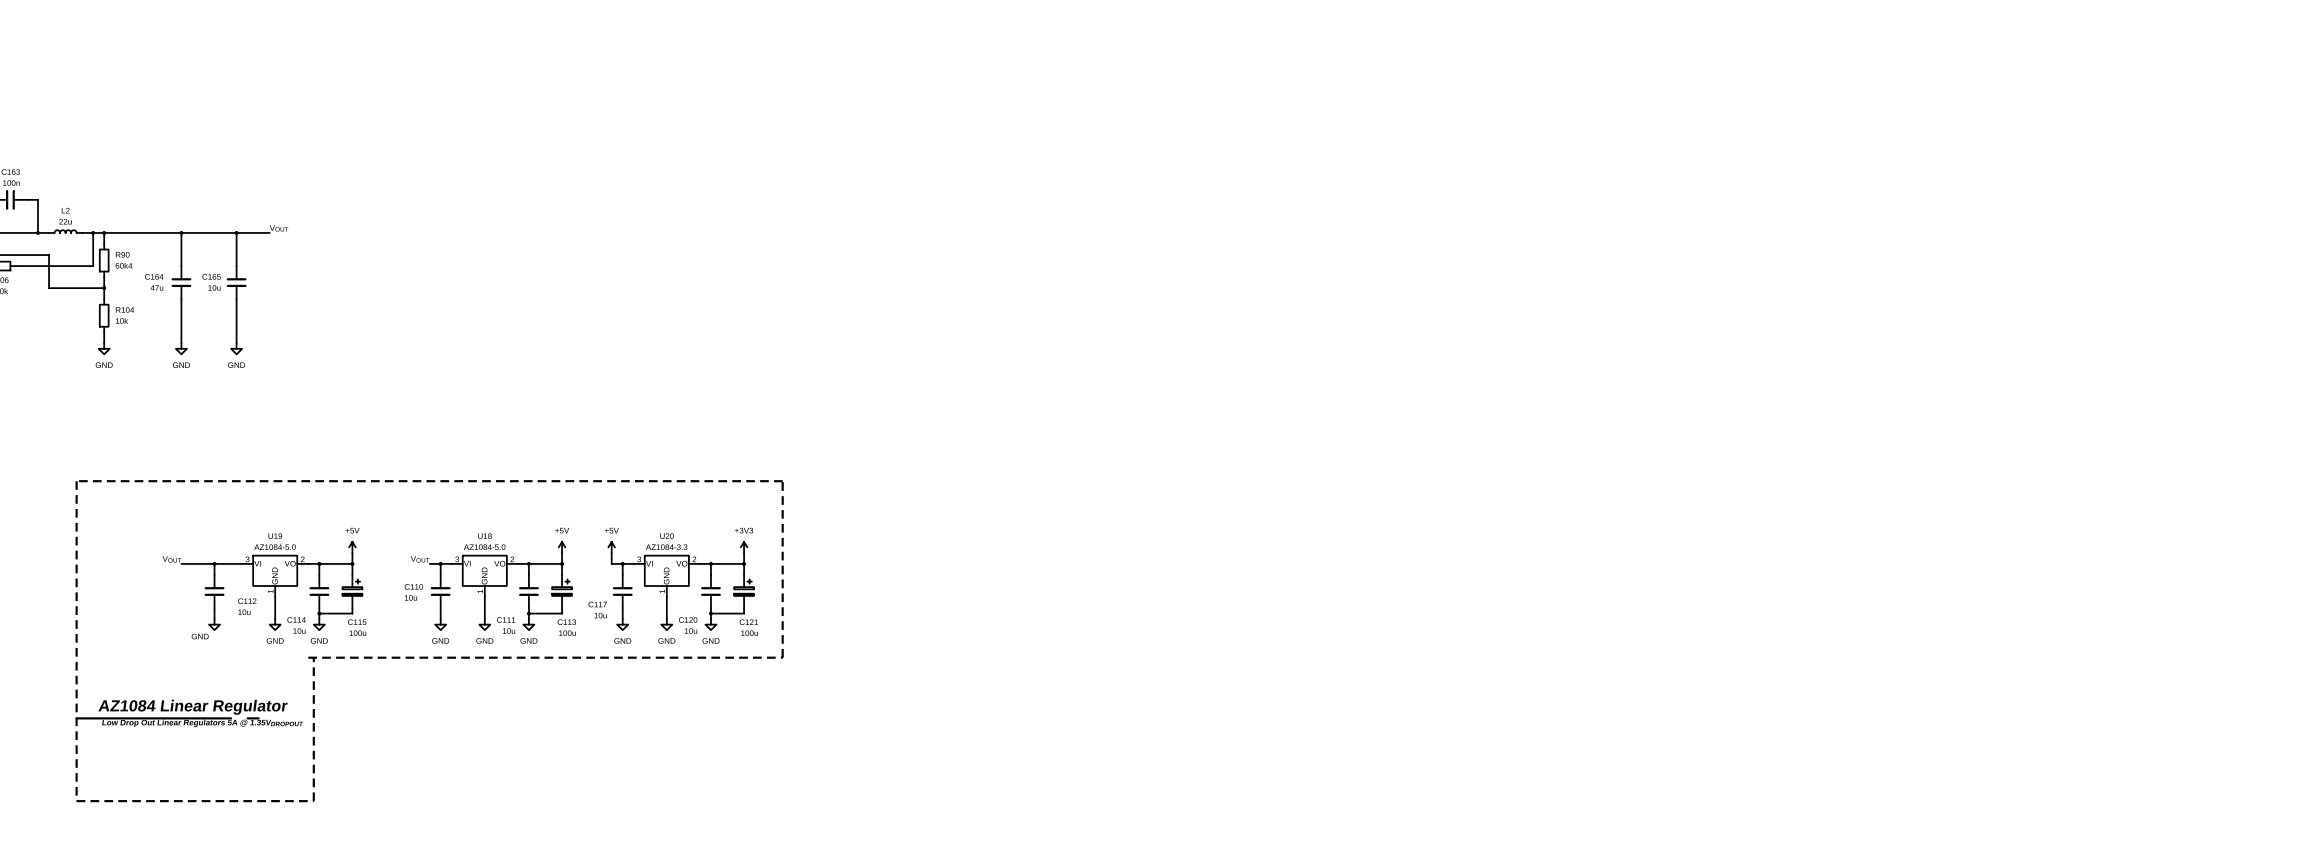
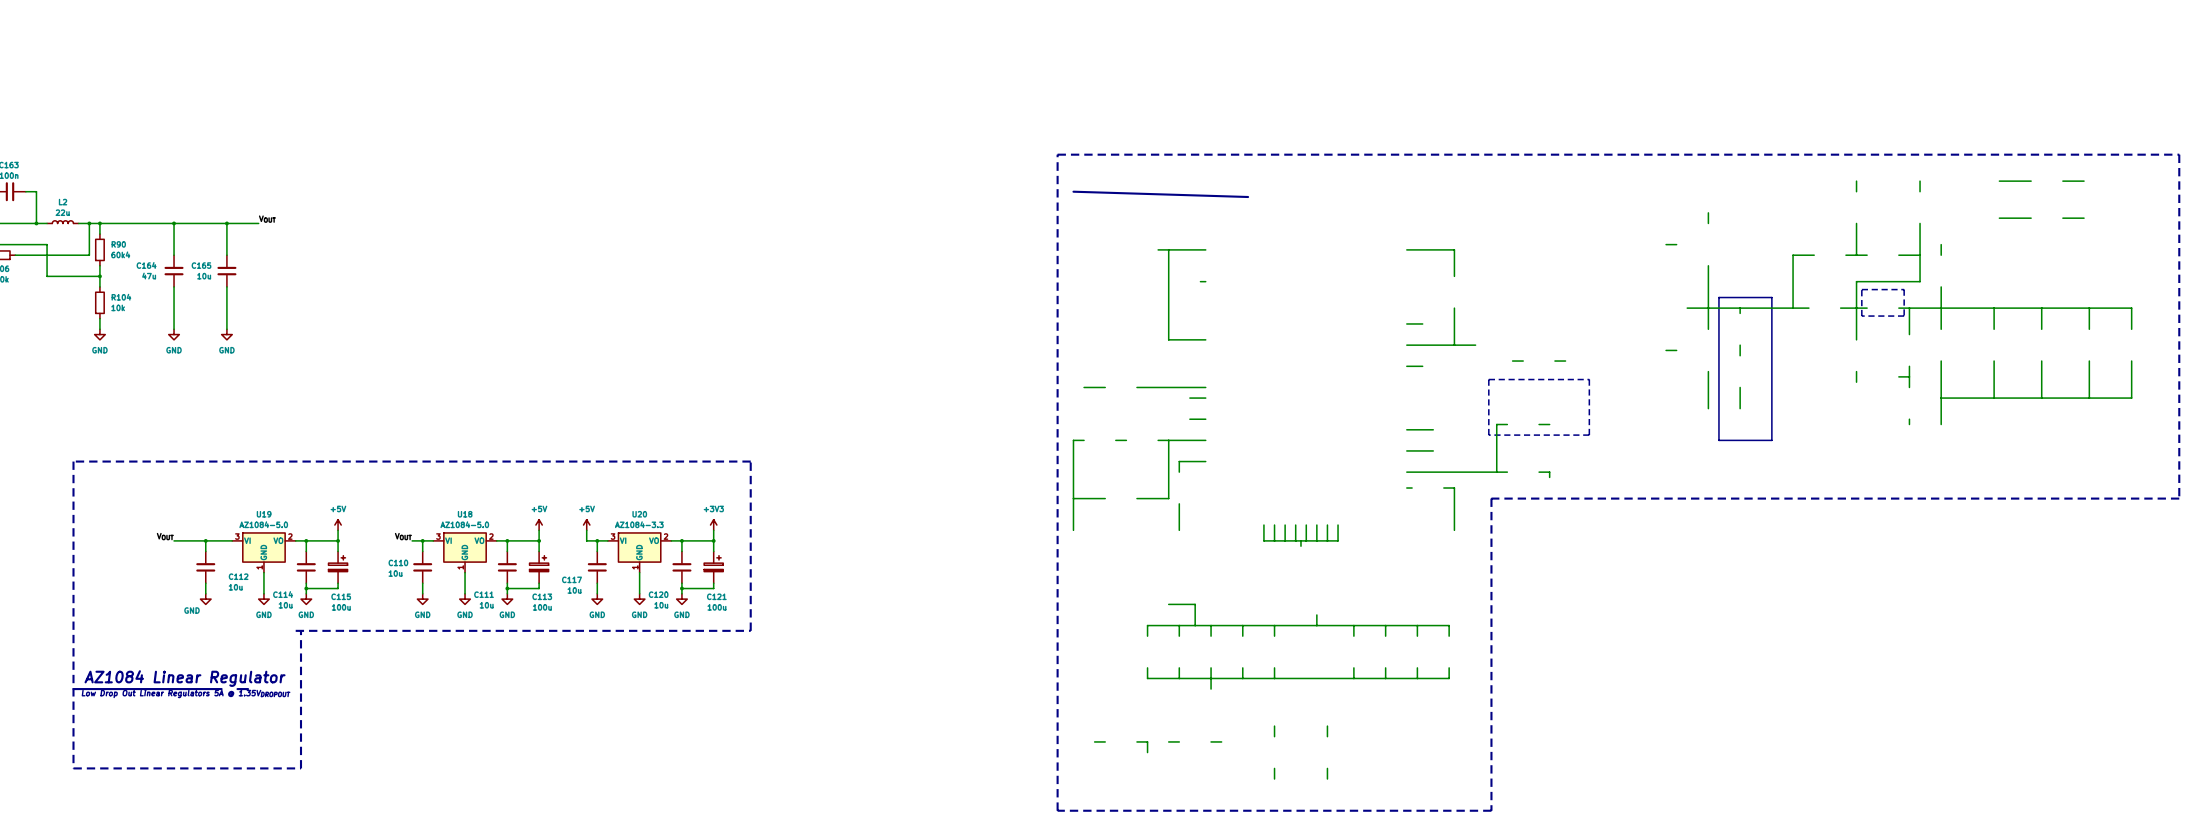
line: none -> (1057, 154) (1057, 810) (1491, 810) (1491, 498) (2179, 498) (2179, 154) (1057, 154)
wire: none -> (1856, 181) (1856, 191)
wire: none -> (1920, 181) (1920, 191)
wire: none -> (1999, 181) (2031, 181)
wire: none -> (2062, 181) (2084, 181)
line: none -> (1073, 191) (1248, 197)
wire: none -> (1708, 212) (1708, 223)
wire: none -> (1999, 218) (2031, 218)
wire: none -> (2062, 218) (2084, 218)
wire: none -> (1856, 223) (1856, 255)
wire: none -> (1920, 223) (1920, 281) (1856, 281) (1856, 339)
wire: none -> (1666, 244) (1676, 244)
wire: none -> (1941, 244) (1941, 255)
wire: none -> (1158, 249) (1205, 249)
wire: none -> (1168, 249) (1168, 339) (1205, 339)
wire: none -> (1406, 249) (1454, 249) (1454, 276)
wire: none -> (1814, 255) (1793, 255) (1793, 308)
wire: none -> (1845, 255) (1867, 255)
wire: none -> (1898, 255) (1920, 255)
wire: none -> (1708, 265) (1708, 329)
wire: none -> (1200, 281) (1205, 281)
wire: none -> (1941, 286) (1941, 329)
line: none -> (1861, 289) (1904, 289) (1904, 316) (1861, 316) (1861, 289)
line: none -> (1718, 297) (1771, 297) (1771, 440) (1718, 440) (1718, 297)
wire: none -> (1454, 308) (1454, 345)
wire: none -> (1687, 308) (1808, 308)
wire: none -> (1740, 308) (1740, 313)
wire: none -> (1840, 308) (1867, 308)
wire: none -> (1898, 308) (2131, 308) (2131, 329)
wire: none -> (1909, 308) (1909, 334)
wire: none -> (1994, 308) (1994, 329)
wire: none -> (2041, 308) (2041, 329)
wire: none -> (2089, 308) (2089, 329)
wire: none -> (1406, 323) (1422, 323)
wire: none -> (1406, 345) (1475, 345)
wire: none -> (1740, 345) (1740, 355)
wire: none -> (1666, 350) (1676, 350)
wire: none -> (1512, 361) (1523, 361)
wire: none -> (1554, 361) (1565, 361)
wire: none -> (1941, 361) (1941, 424)
wire: none -> (1994, 361) (1994, 398)
wire: none -> (2041, 361) (2041, 398)
wire: none -> (2089, 361) (2089, 398)
wire: none -> (2131, 361) (2131, 398) (1941, 398)
wire: none -> (1406, 366) (1422, 366)
wire: none -> (1909, 366) (1909, 387)
wire: none -> (1708, 371) (1708, 408)
wire: none -> (1856, 371) (1856, 382)
wire: none -> (1898, 376) (1909, 376)
line: none -> (1488, 379) (1589, 379) (1589, 435) (1488, 435) (1488, 379)
wire: none -> (1084, 387) (1105, 387)
wire: none -> (1136, 387) (1205, 387)
wire: none -> (1740, 387) (1740, 408)
wire: none -> (1189, 398) (1205, 398)
wire: none -> (1189, 419) (1205, 419)
wire: none -> (1909, 419) (1909, 424)
wire: none -> (1507, 424) (1496, 424) (1496, 472)
wire: none -> (1539, 424) (1549, 424)
wire: none -> (1406, 429) (1433, 429)
wire: none -> (1084, 440) (1073, 440) (1073, 530)
wire: none -> (1115, 440) (1126, 440)
wire: none -> (1158, 440) (1205, 440)
wire: none -> (1168, 440) (1168, 498) (1136, 498)
wire: none -> (1406, 450) (1433, 450)
wire: none -> (1205, 461) (1179, 461) (1179, 472)
wire: none -> (1406, 472) (1507, 472)
wire: none -> (1539, 472) (1549, 472) (1549, 477)
wire: none -> (1406, 488) (1412, 488)
wire: none -> (1443, 488) (1454, 488) (1454, 530)
wire: none -> (1073, 498) (1105, 498)
wire: none -> (1179, 503) (1179, 530)
wire: none -> (1263, 525) (1263, 540) (1338, 540) (1338, 525)
wire: none -> (1274, 525) (1274, 540)
wire: none -> (1285, 525) (1285, 540)
wire: none -> (1295, 525) (1295, 540)
wire: none -> (1306, 525) (1306, 540)
wire: none -> (1316, 525) (1316, 540)
wire: none -> (1327, 525) (1327, 540)
wire: none -> (1300, 540) (1300, 546)
wire: none -> (1168, 604) (1195, 604) (1195, 625)
wire: none -> (1316, 614) (1316, 625)
wire: none -> (1179, 625) (1179, 636)
wire: none -> (1211, 625) (1211, 636)
wire: none -> (1242, 625) (1242, 636)
wire: none -> (1274, 625) (1274, 636)
wire: none -> (1353, 625) (1353, 636)
wire: none -> (1385, 625) (1385, 636)
wire: none -> (1417, 625) (1417, 636)
wire: none -> (1147, 636) (1147, 625) (1449, 625) (1449, 636)
wire: none -> (1147, 667) (1147, 678) (1449, 678) (1449, 667)
wire: none -> (1179, 667) (1179, 678)
wire: none -> (1211, 667) (1211, 689)
wire: none -> (1242, 667) (1242, 678)
wire: none -> (1274, 667) (1274, 678)
wire: none -> (1353, 667) (1353, 678)
wire: none -> (1385, 667) (1385, 678)
wire: none -> (1417, 667) (1417, 678)
wire: none -> (1274, 726) (1274, 736)
wire: none -> (1327, 726) (1327, 736)
wire: none -> (1094, 741) (1105, 741)
wire: none -> (1136, 741) (1147, 741) (1147, 752)
wire: none -> (1168, 741) (1179, 741)
wire: none -> (1211, 741) (1221, 741)
wire: none -> (1274, 768) (1274, 779)
wire: none -> (1327, 768) (1327, 779)

